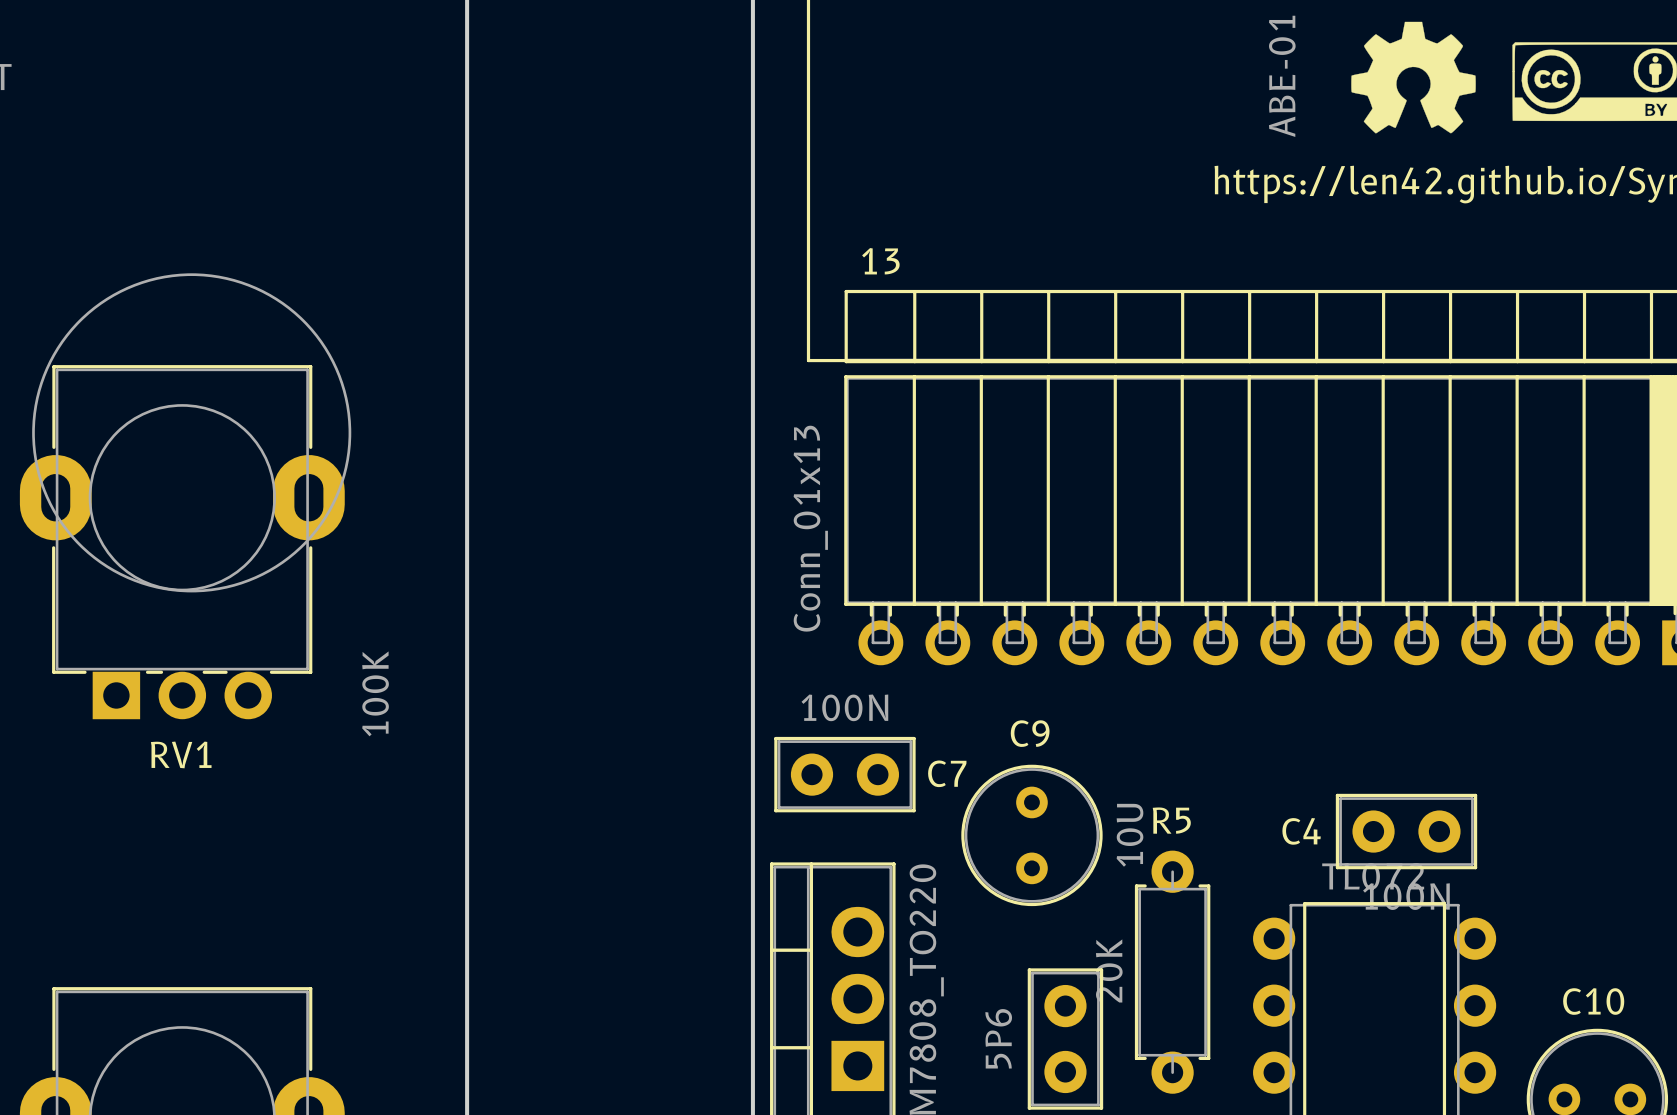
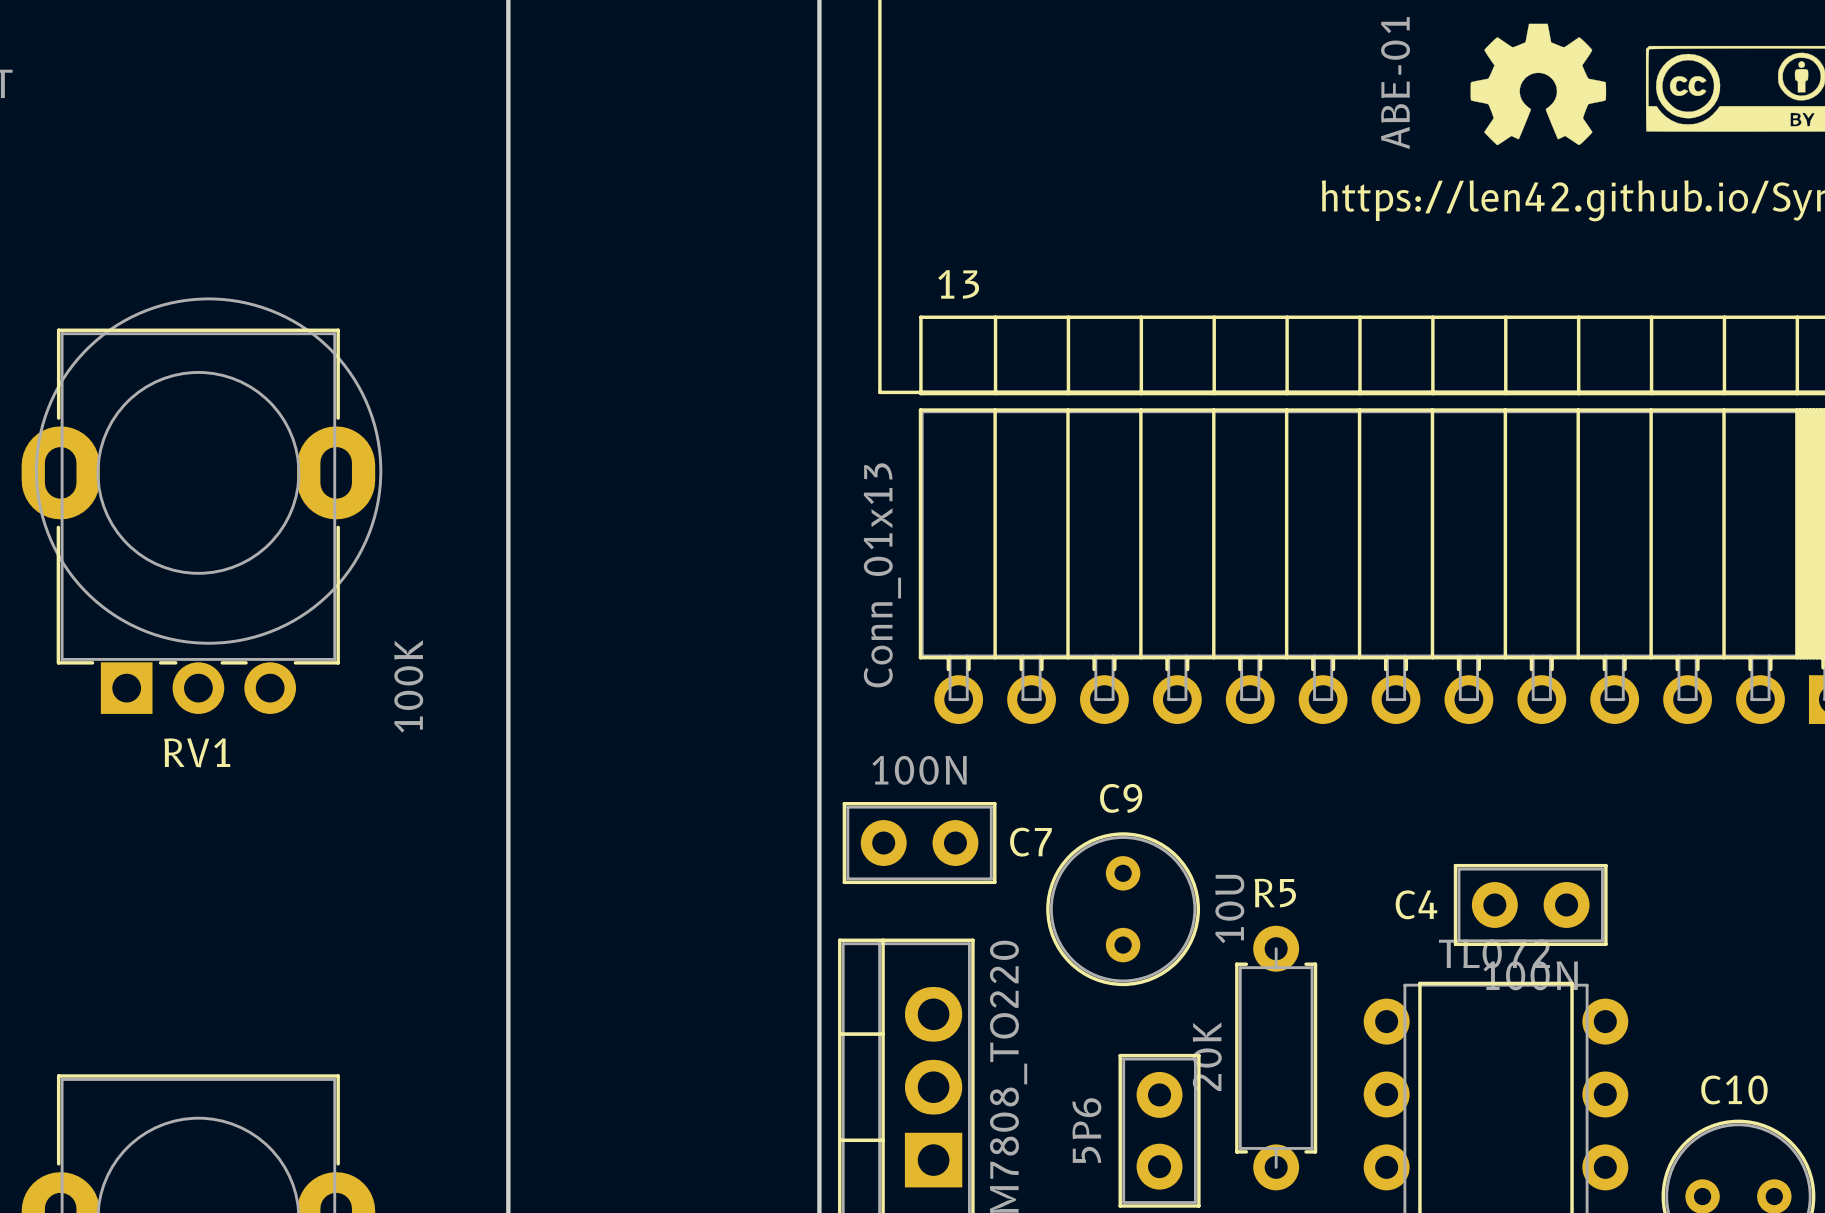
RV1 position: (182, 542) -> (198, 521)

